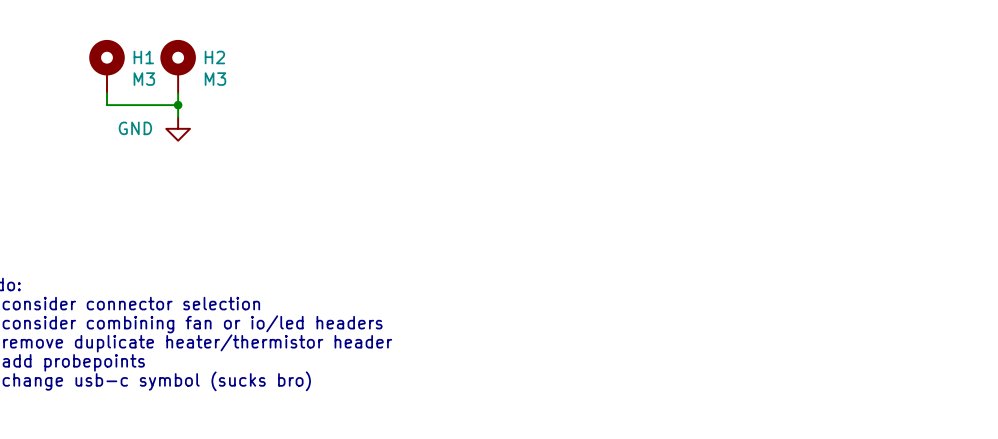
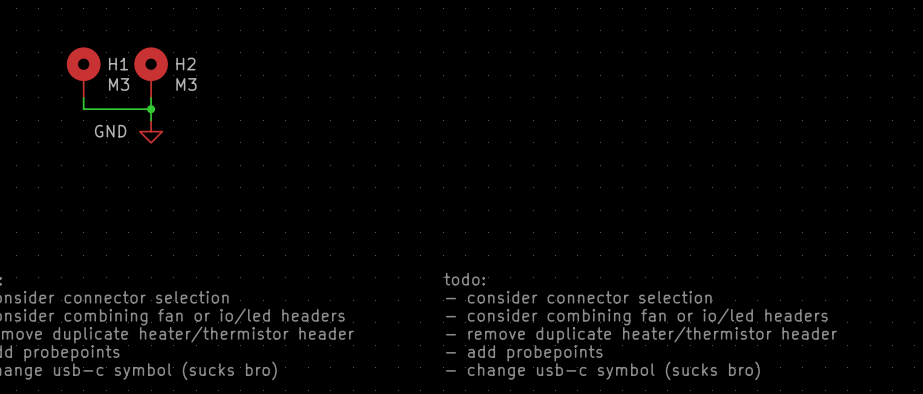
text: none -> todo: (464, 279)
text: none -> - consider connector selection (578, 297)
text: none -> - consider combining fan or io/led headers (636, 316)
text: none -> - remove duplicate heater/thermistor header (641, 335)
text: none -> - add probepoints (524, 353)
text: none -> - change usb-c symbol (sucks bro) (602, 370)

